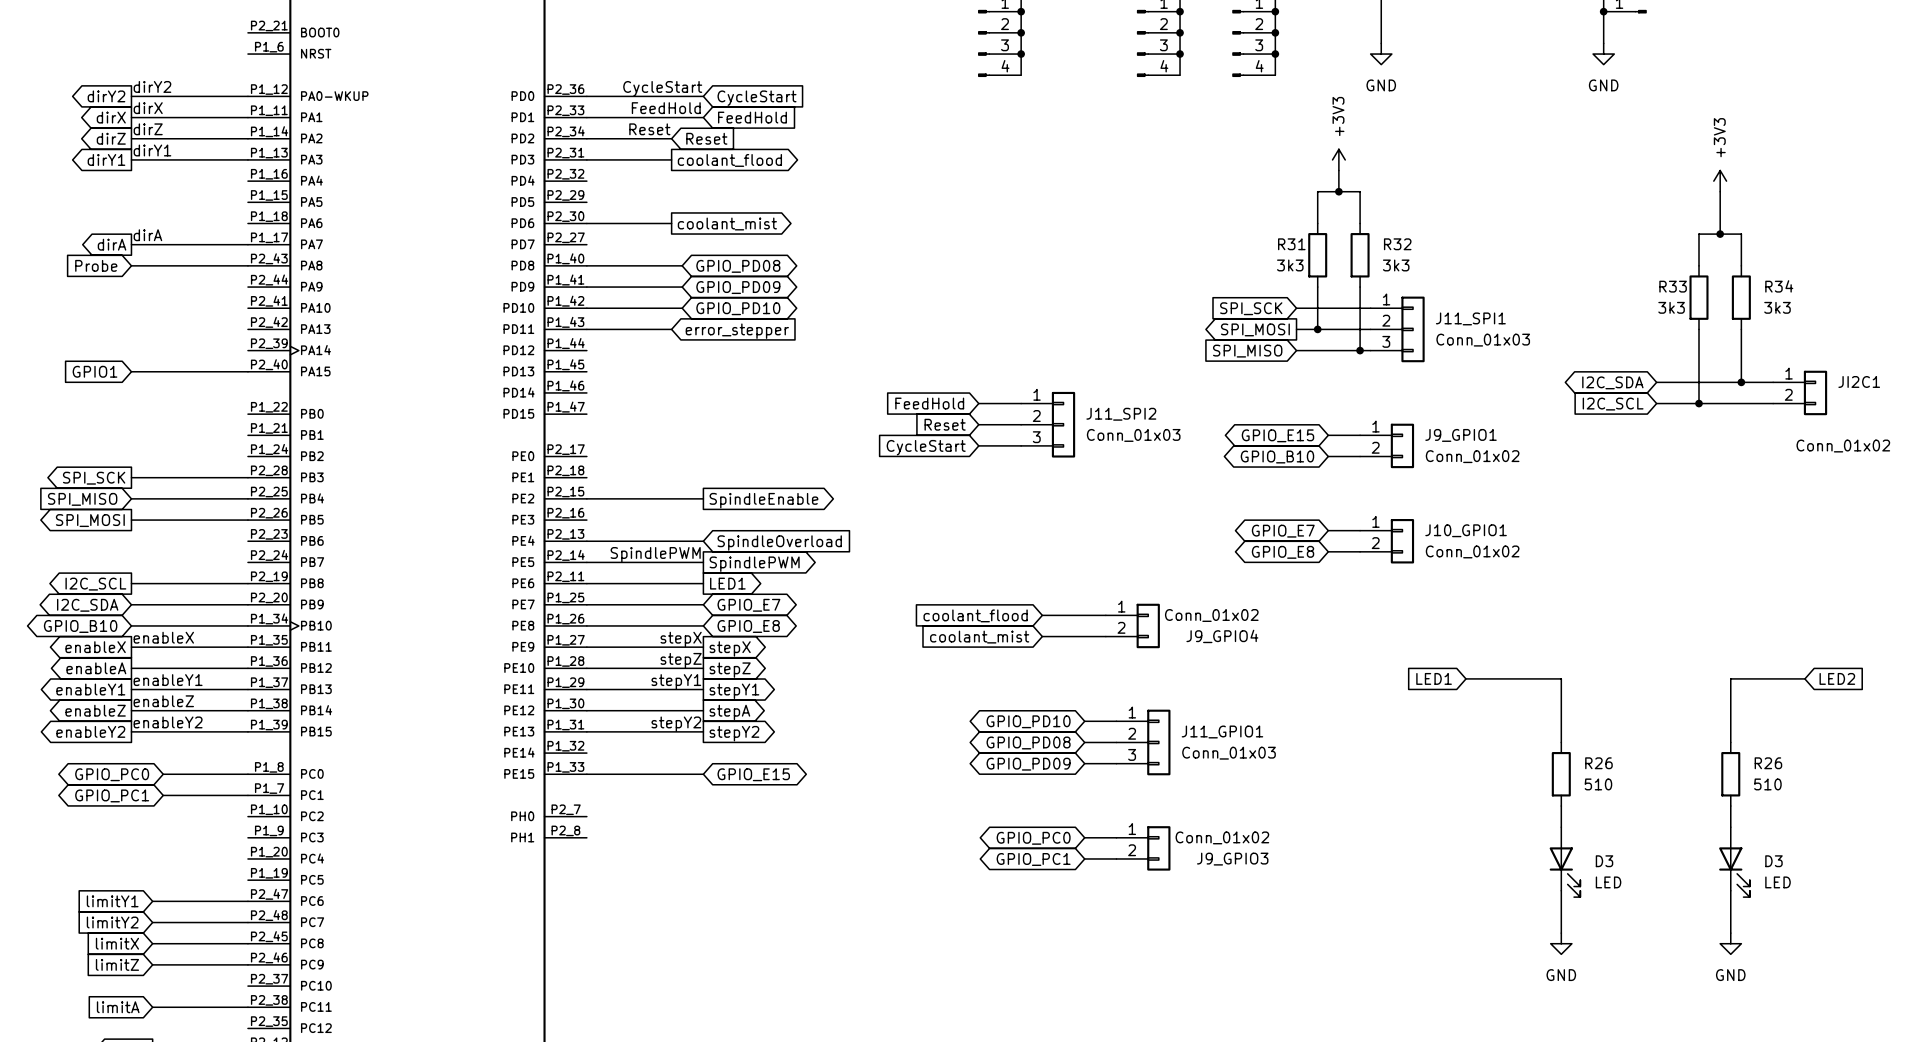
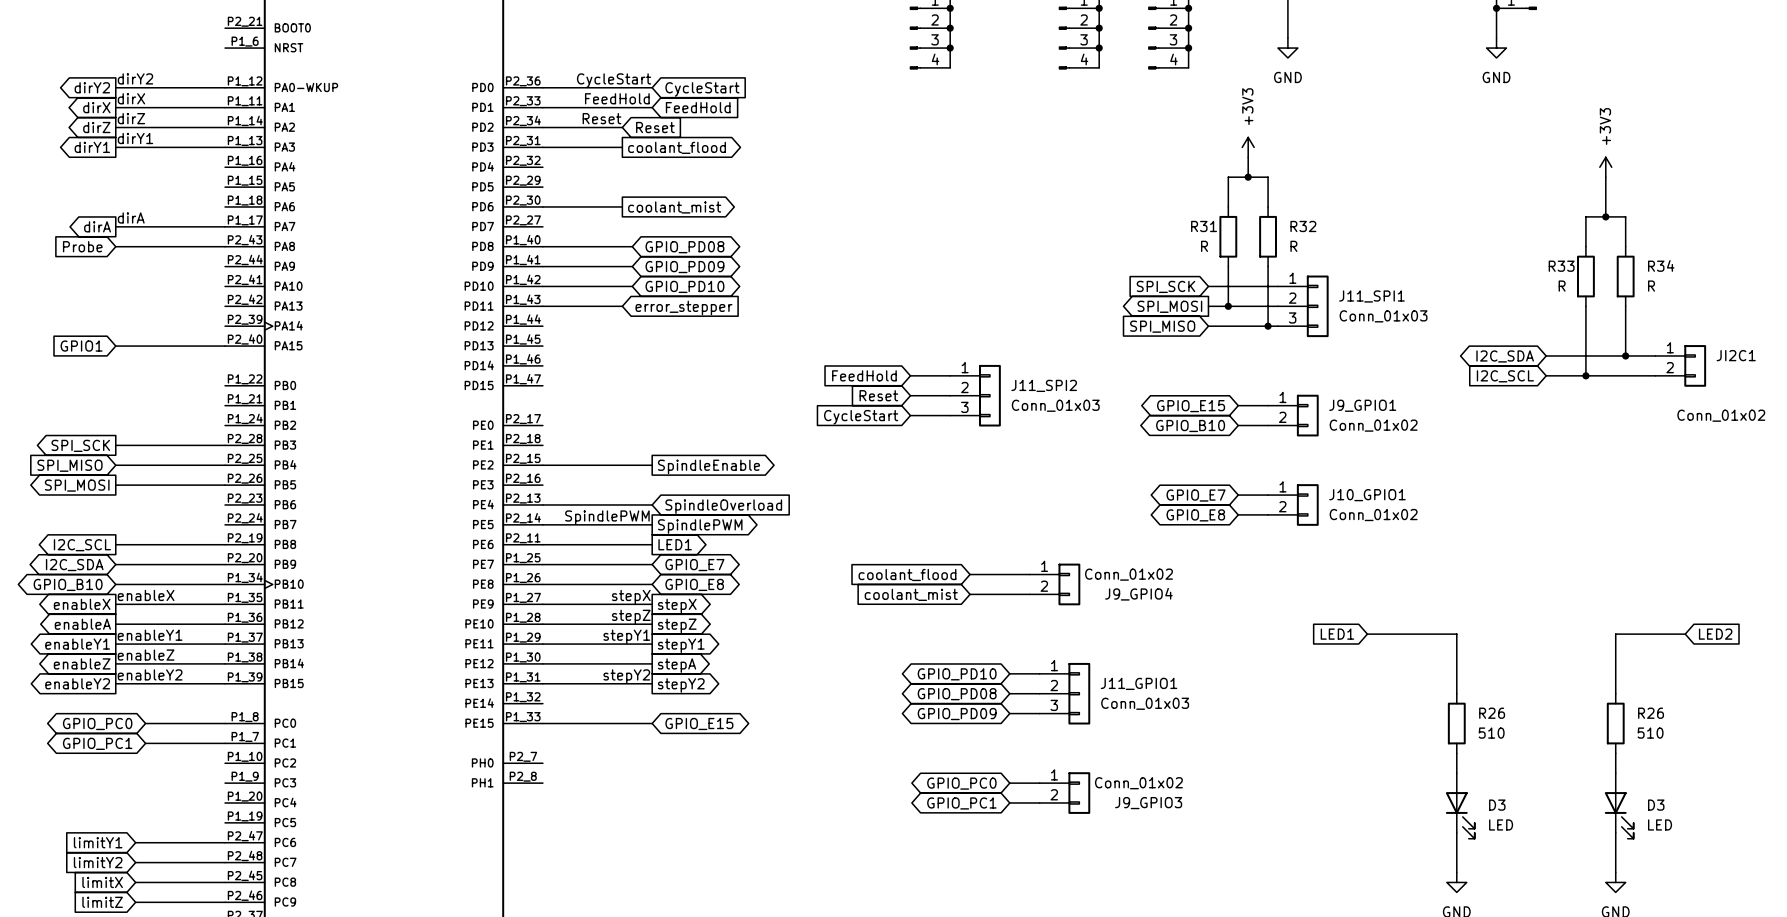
R31 value: 3k3 (1290, 265) -> R (1204, 246)
R32 value: 3k3 (1396, 265) -> R (1293, 246)
R33 value: 3k3 (1671, 307) -> R (1562, 286)
R34 value: 3k3 (1777, 307) -> R (1651, 286)

